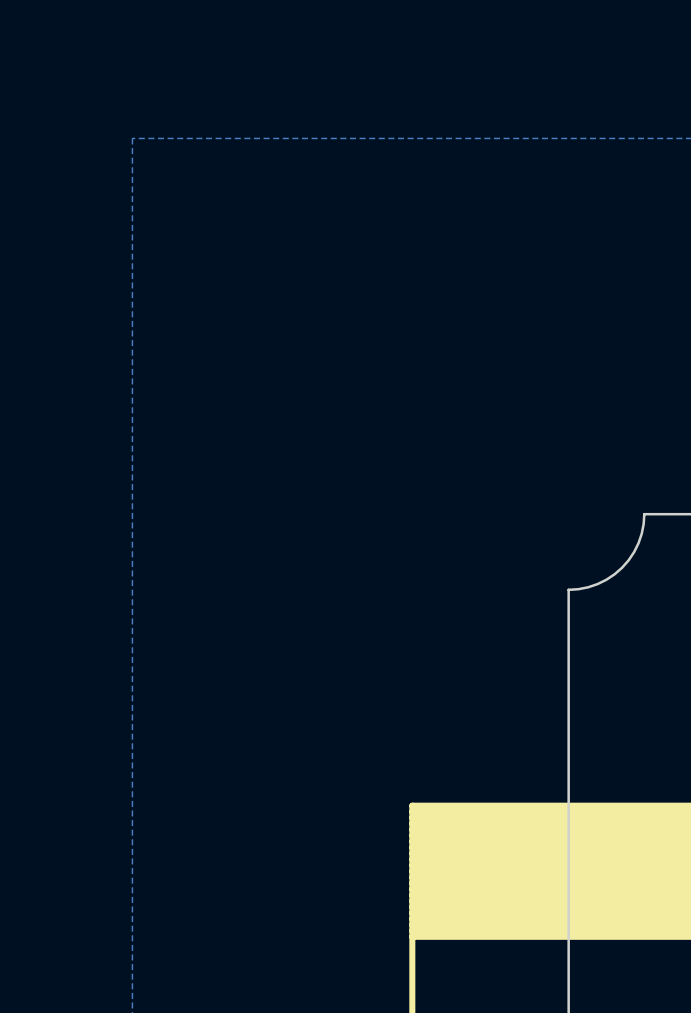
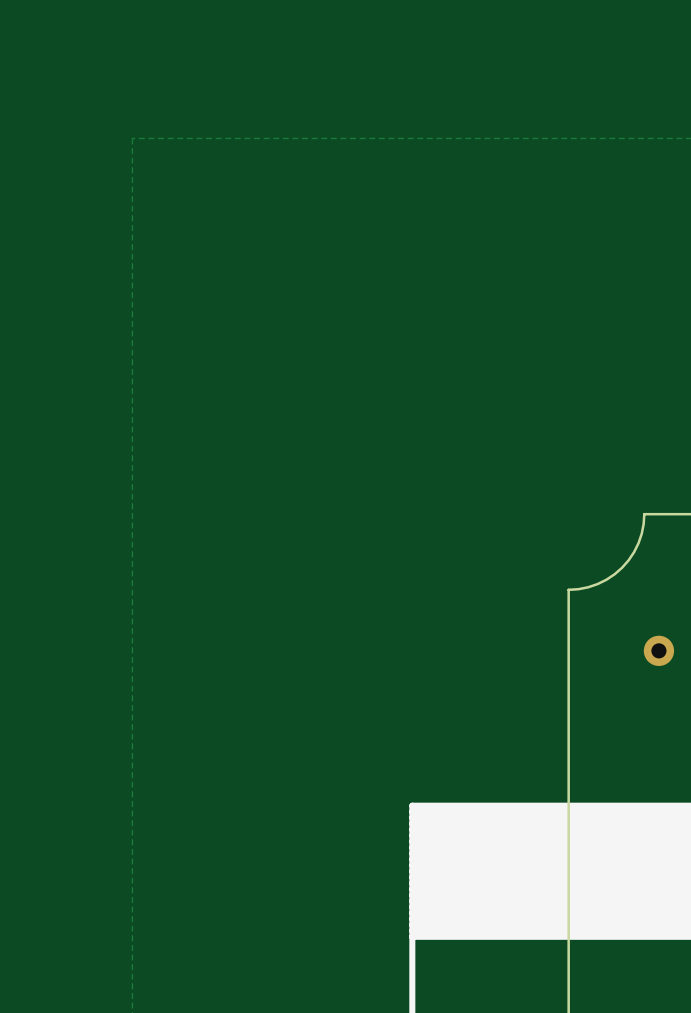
via: none -> (658, 650)

